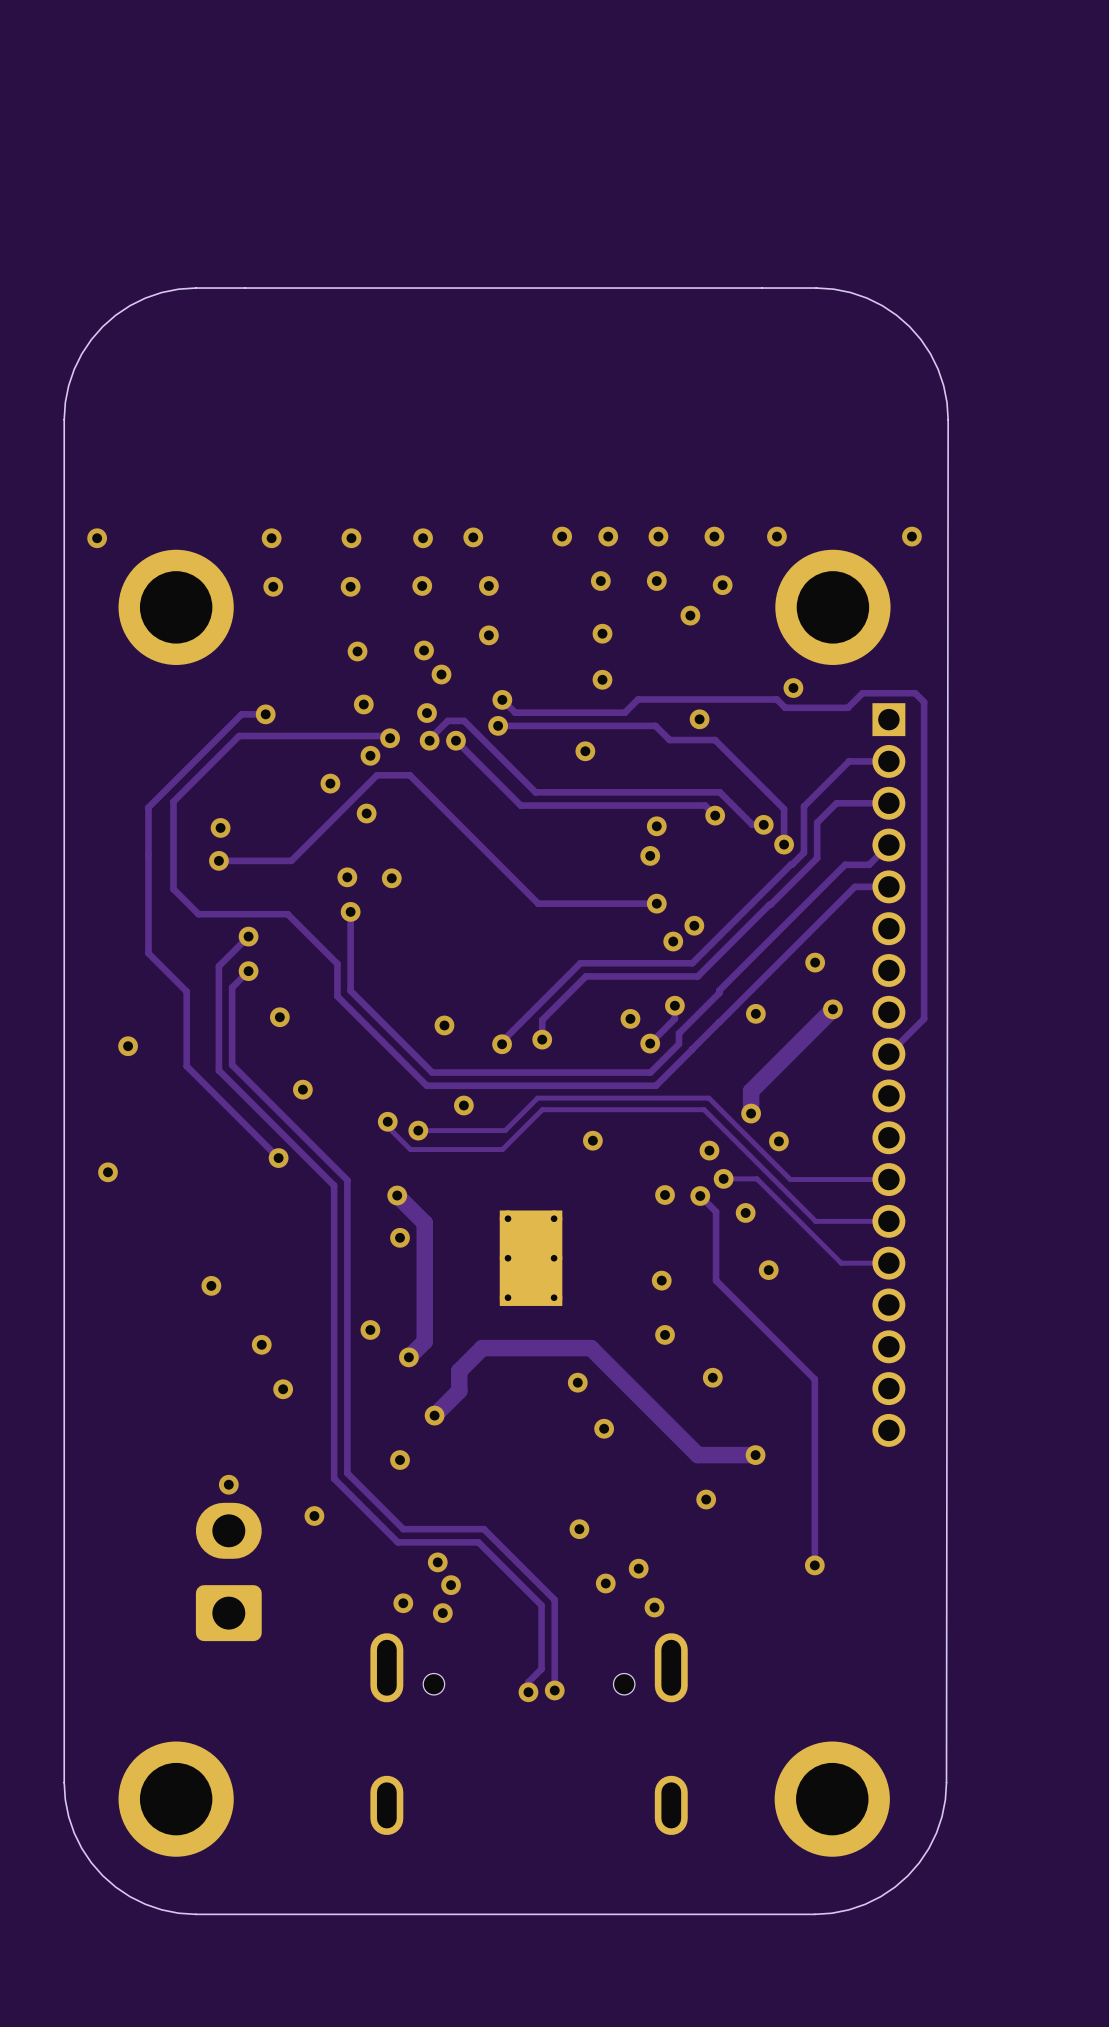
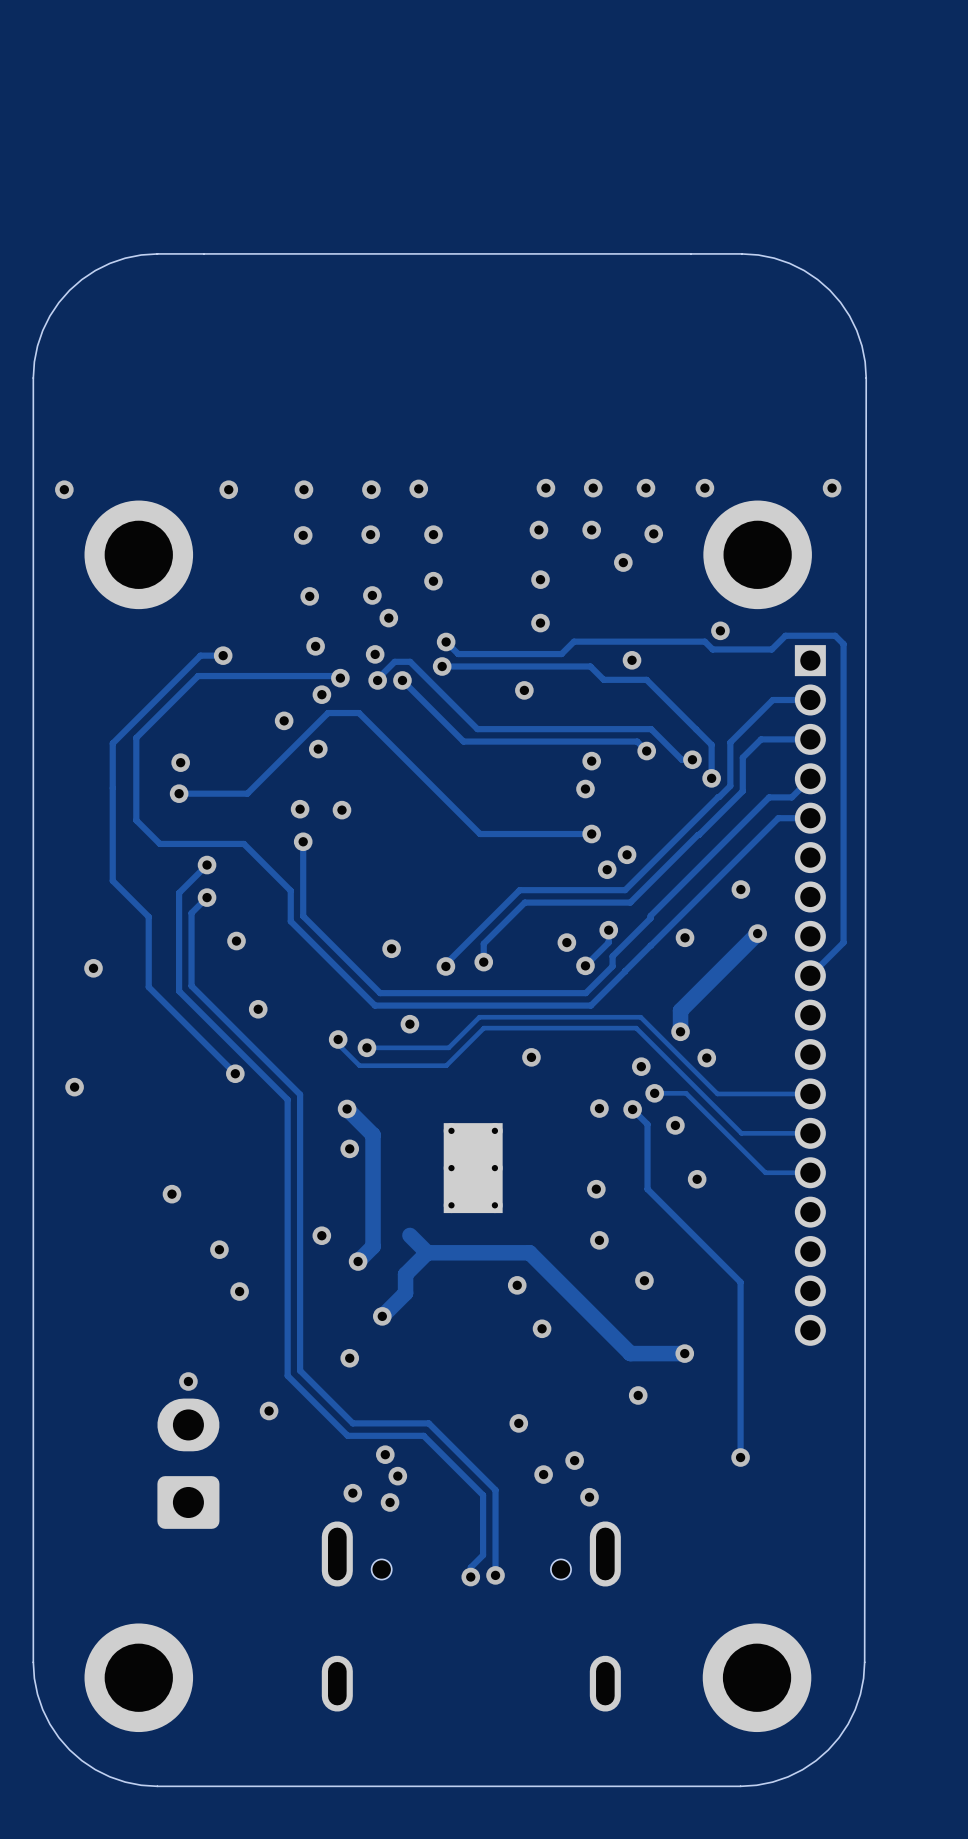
via: (562, 536) -> none
via: (273, 586) -> none
track: none -> (409, 1235) (427, 1252)

